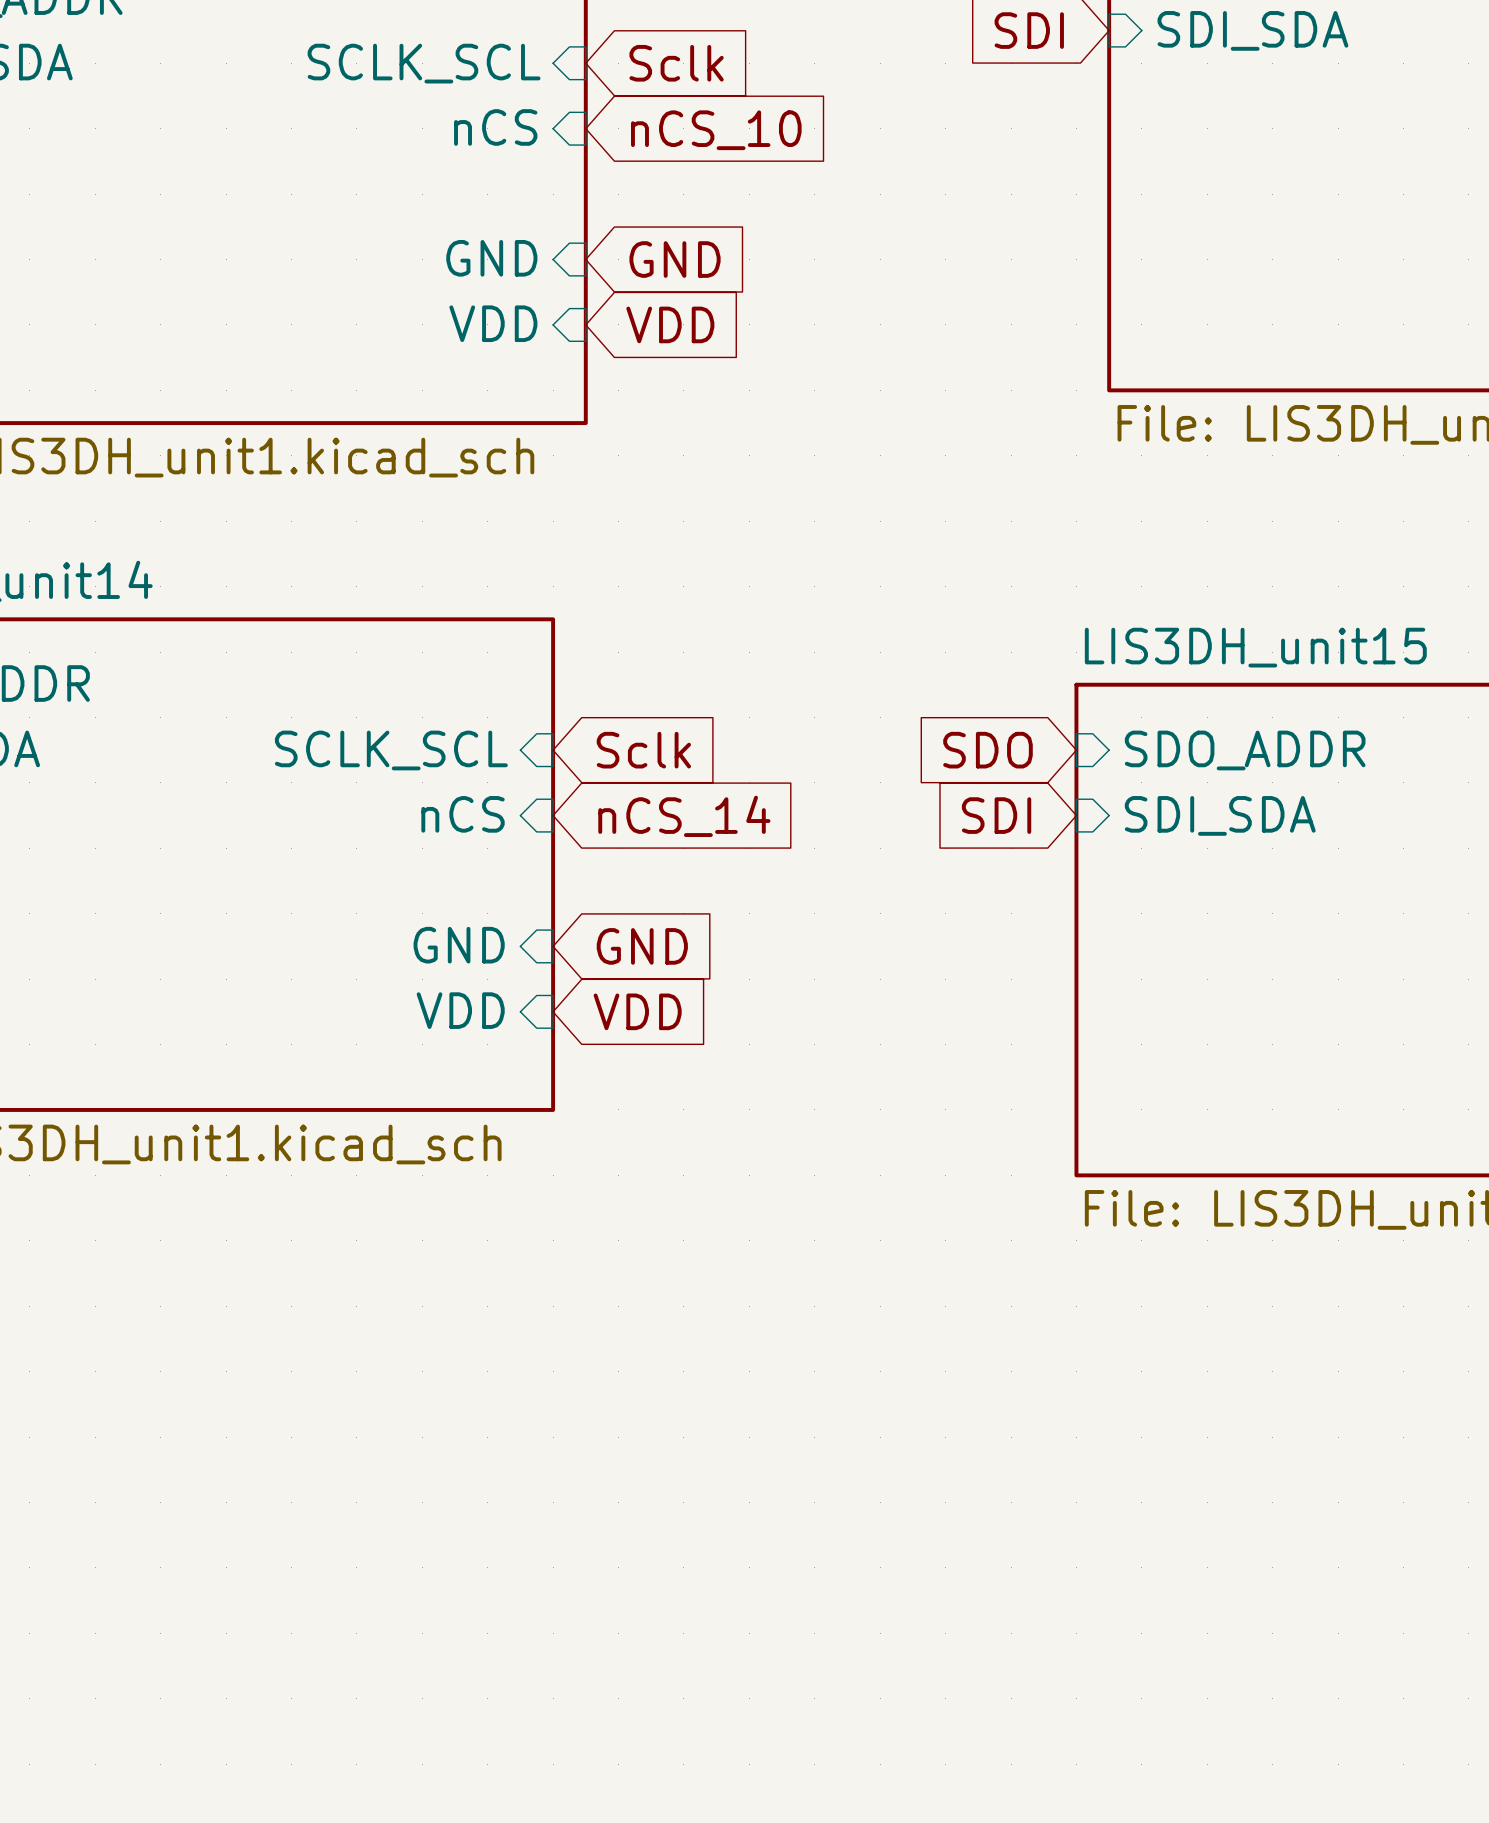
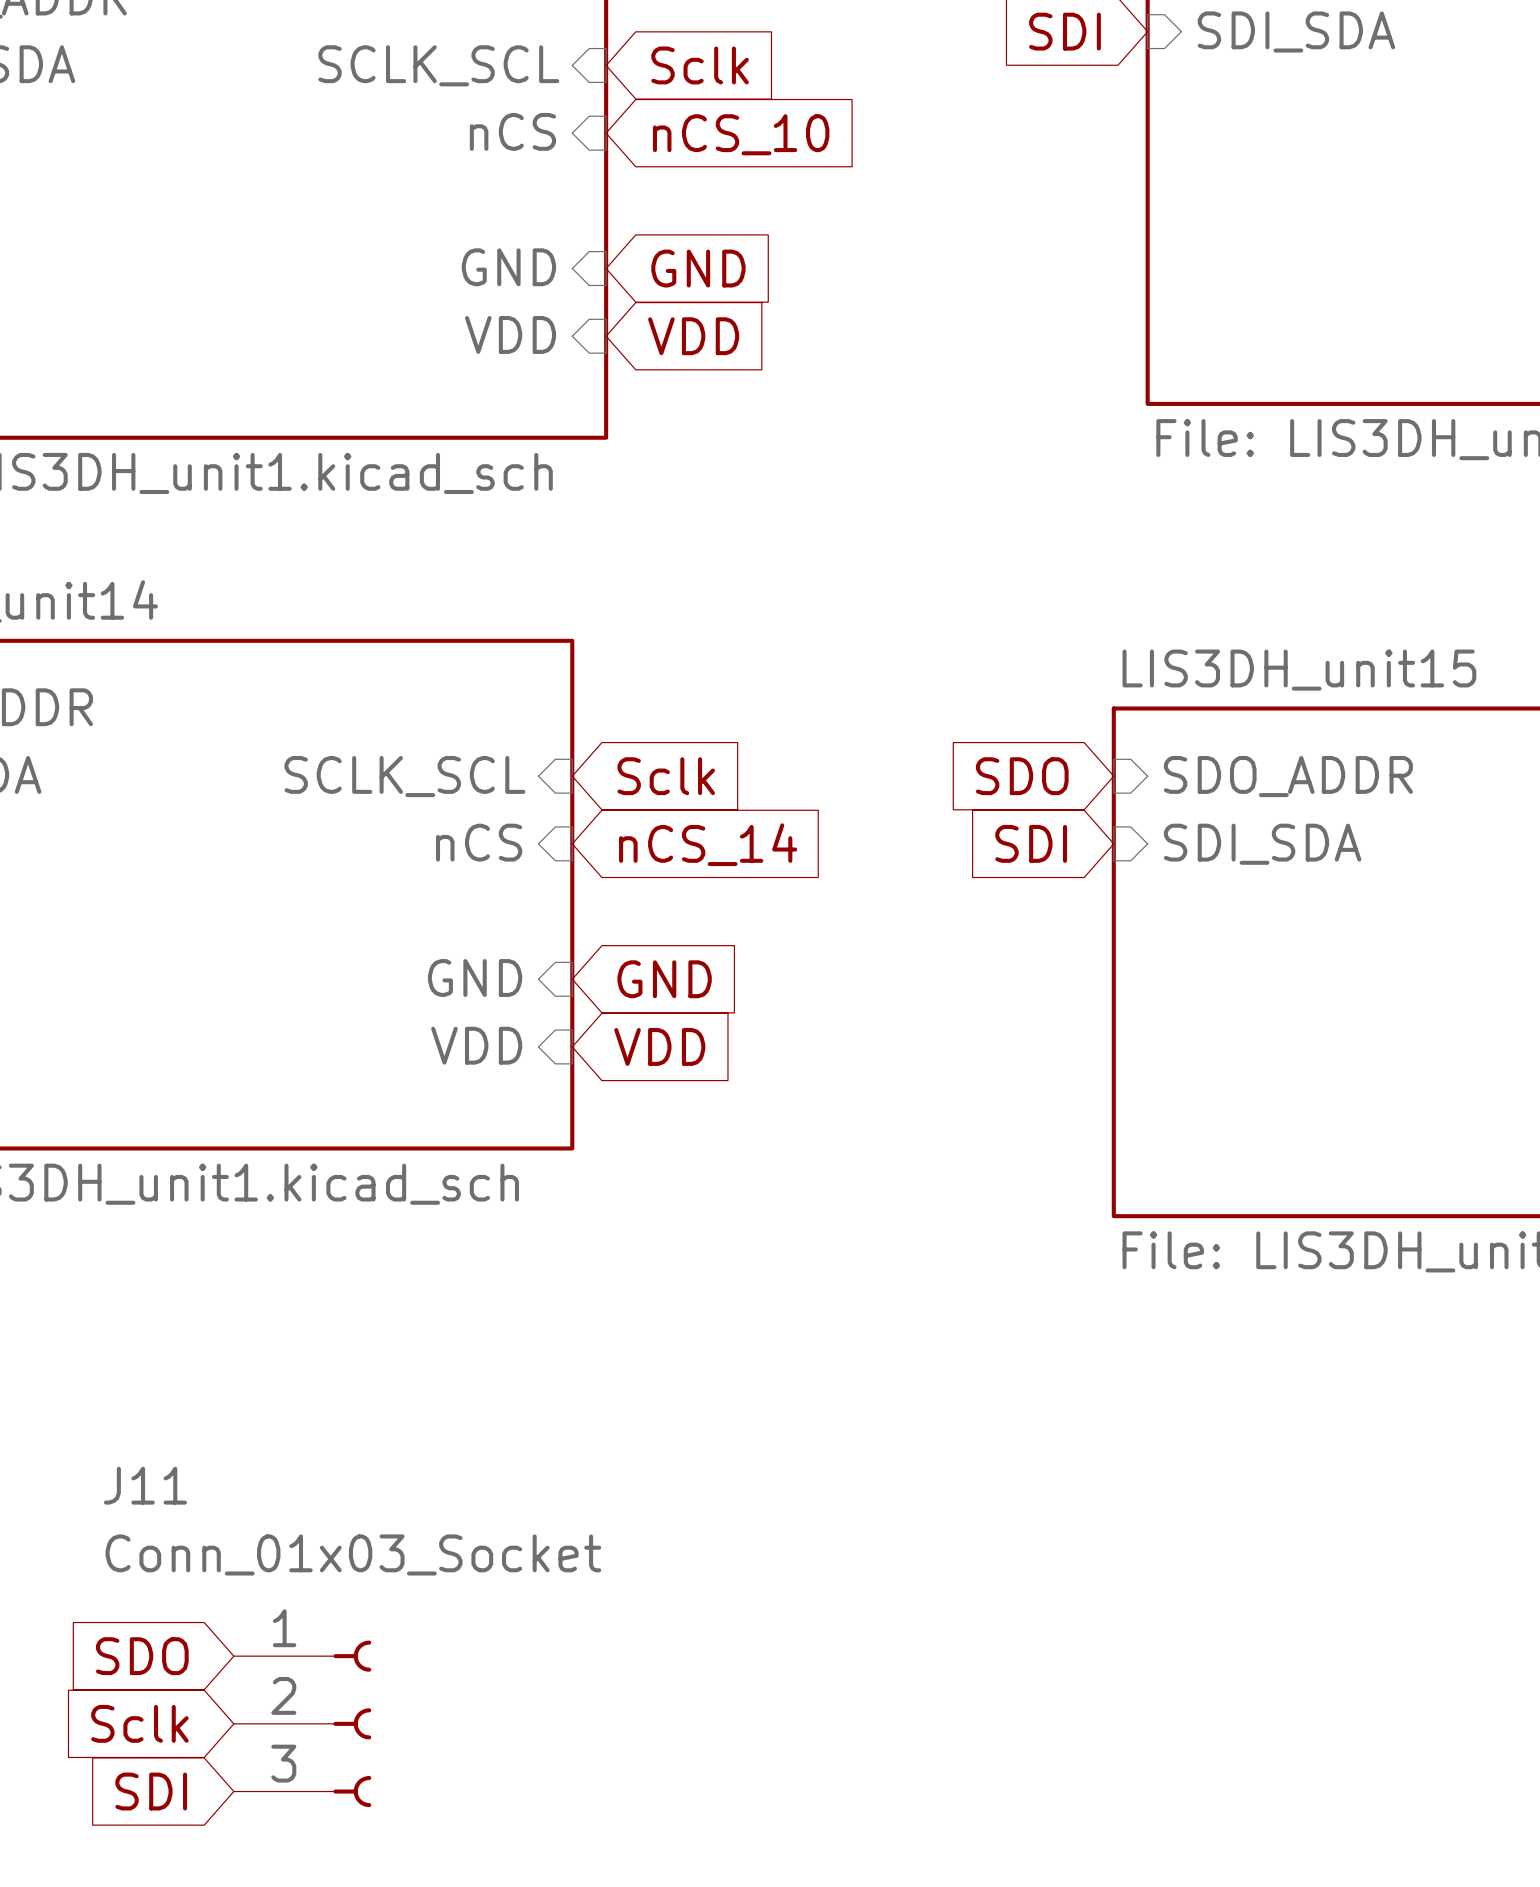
global label: none -> SDO (142, 1656)
global label: none -> Sclk (139, 1723)
J11: none -> Conn_01x03_Socket (302, 1723)
global label: none -> SDI (151, 1791)

